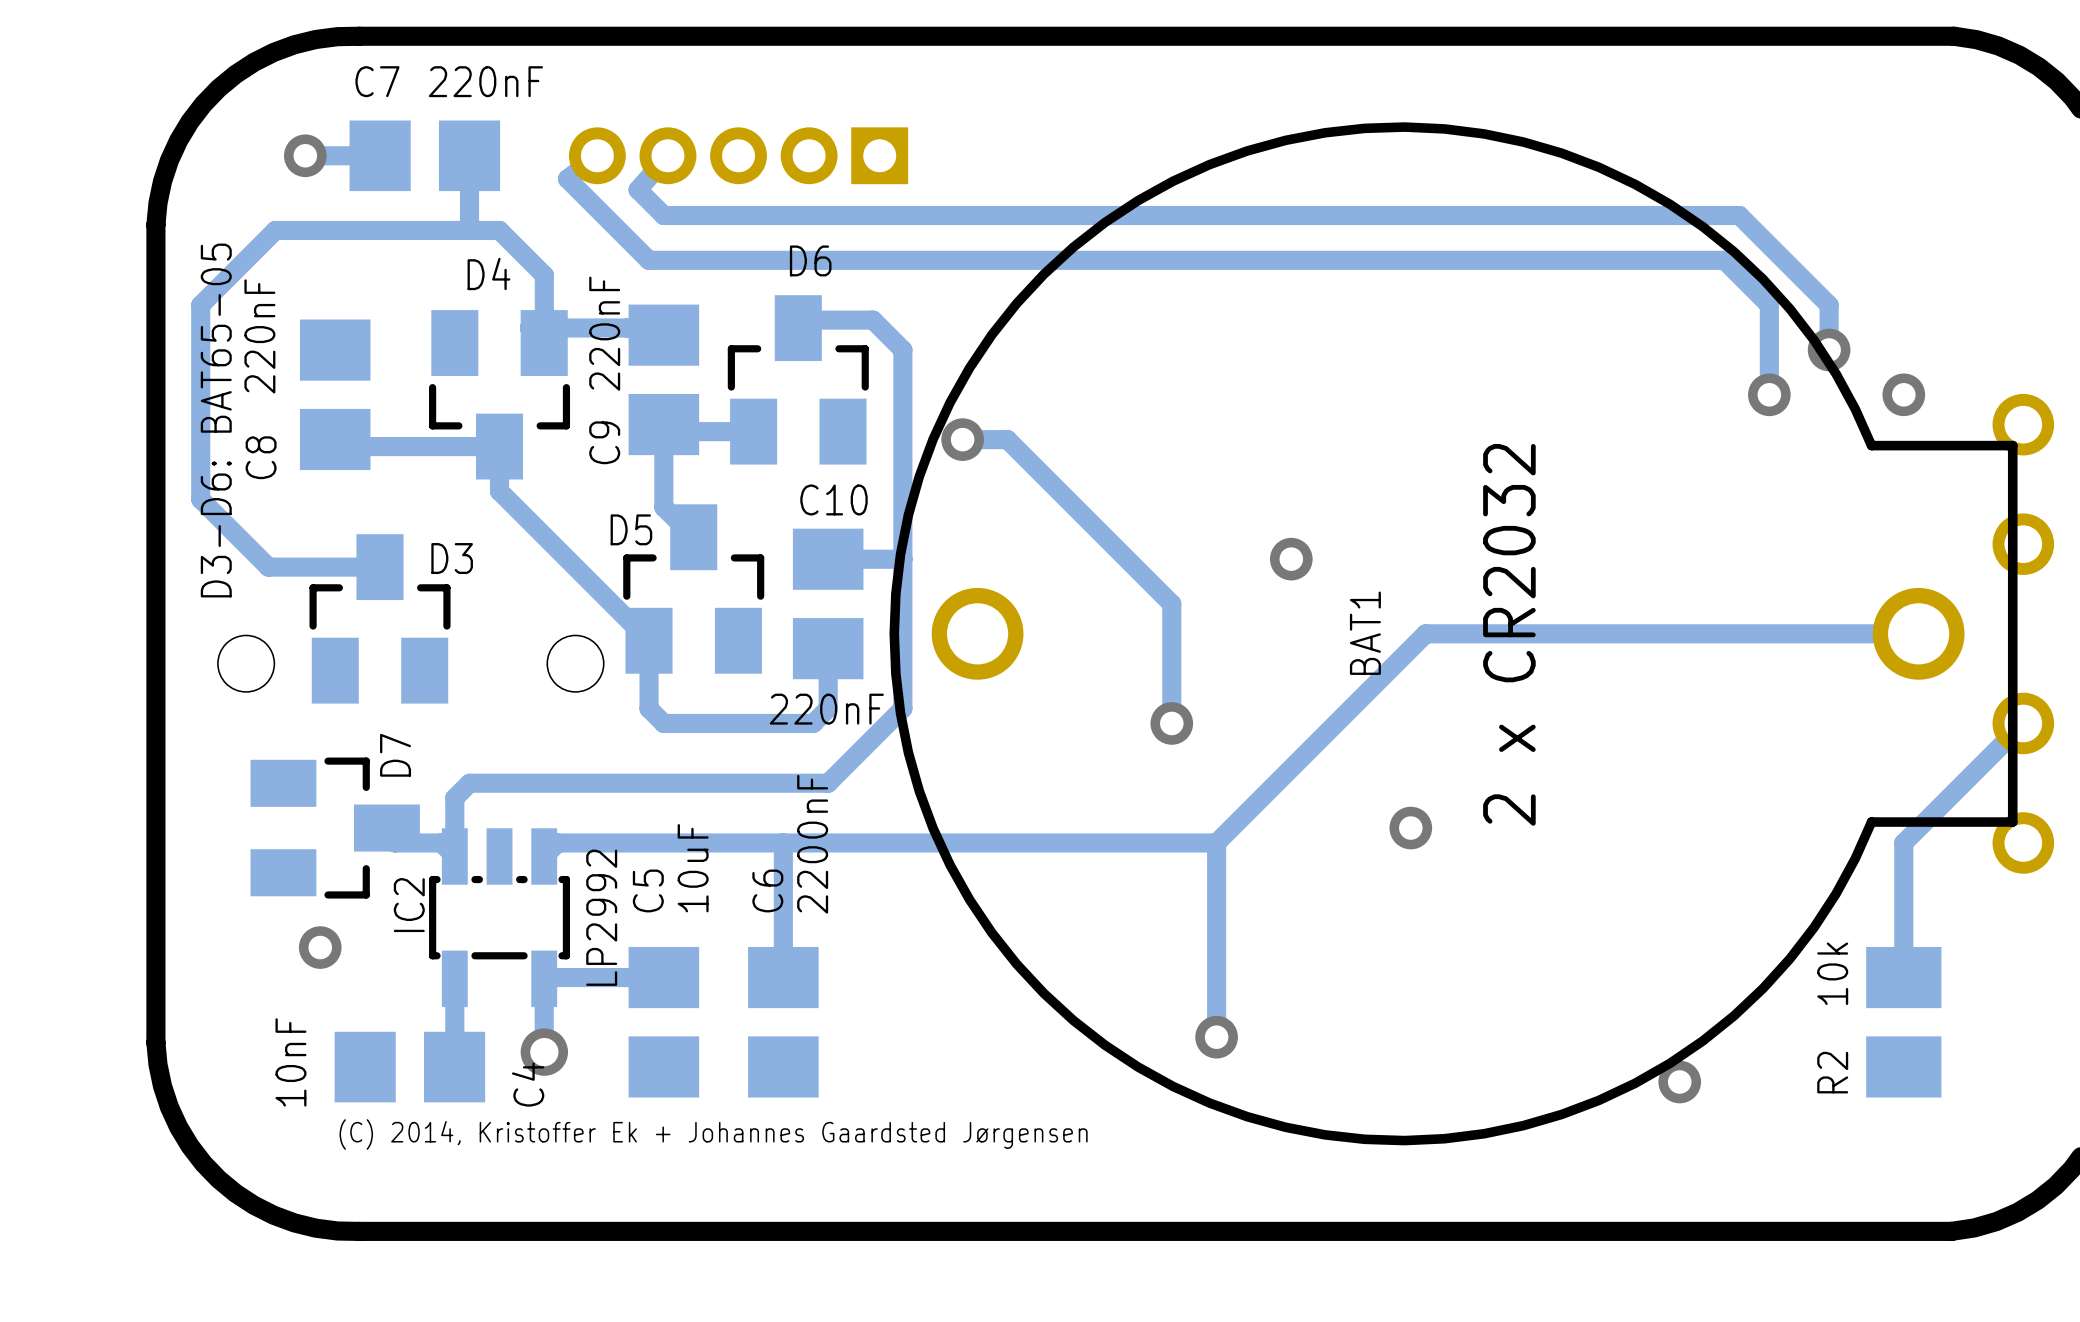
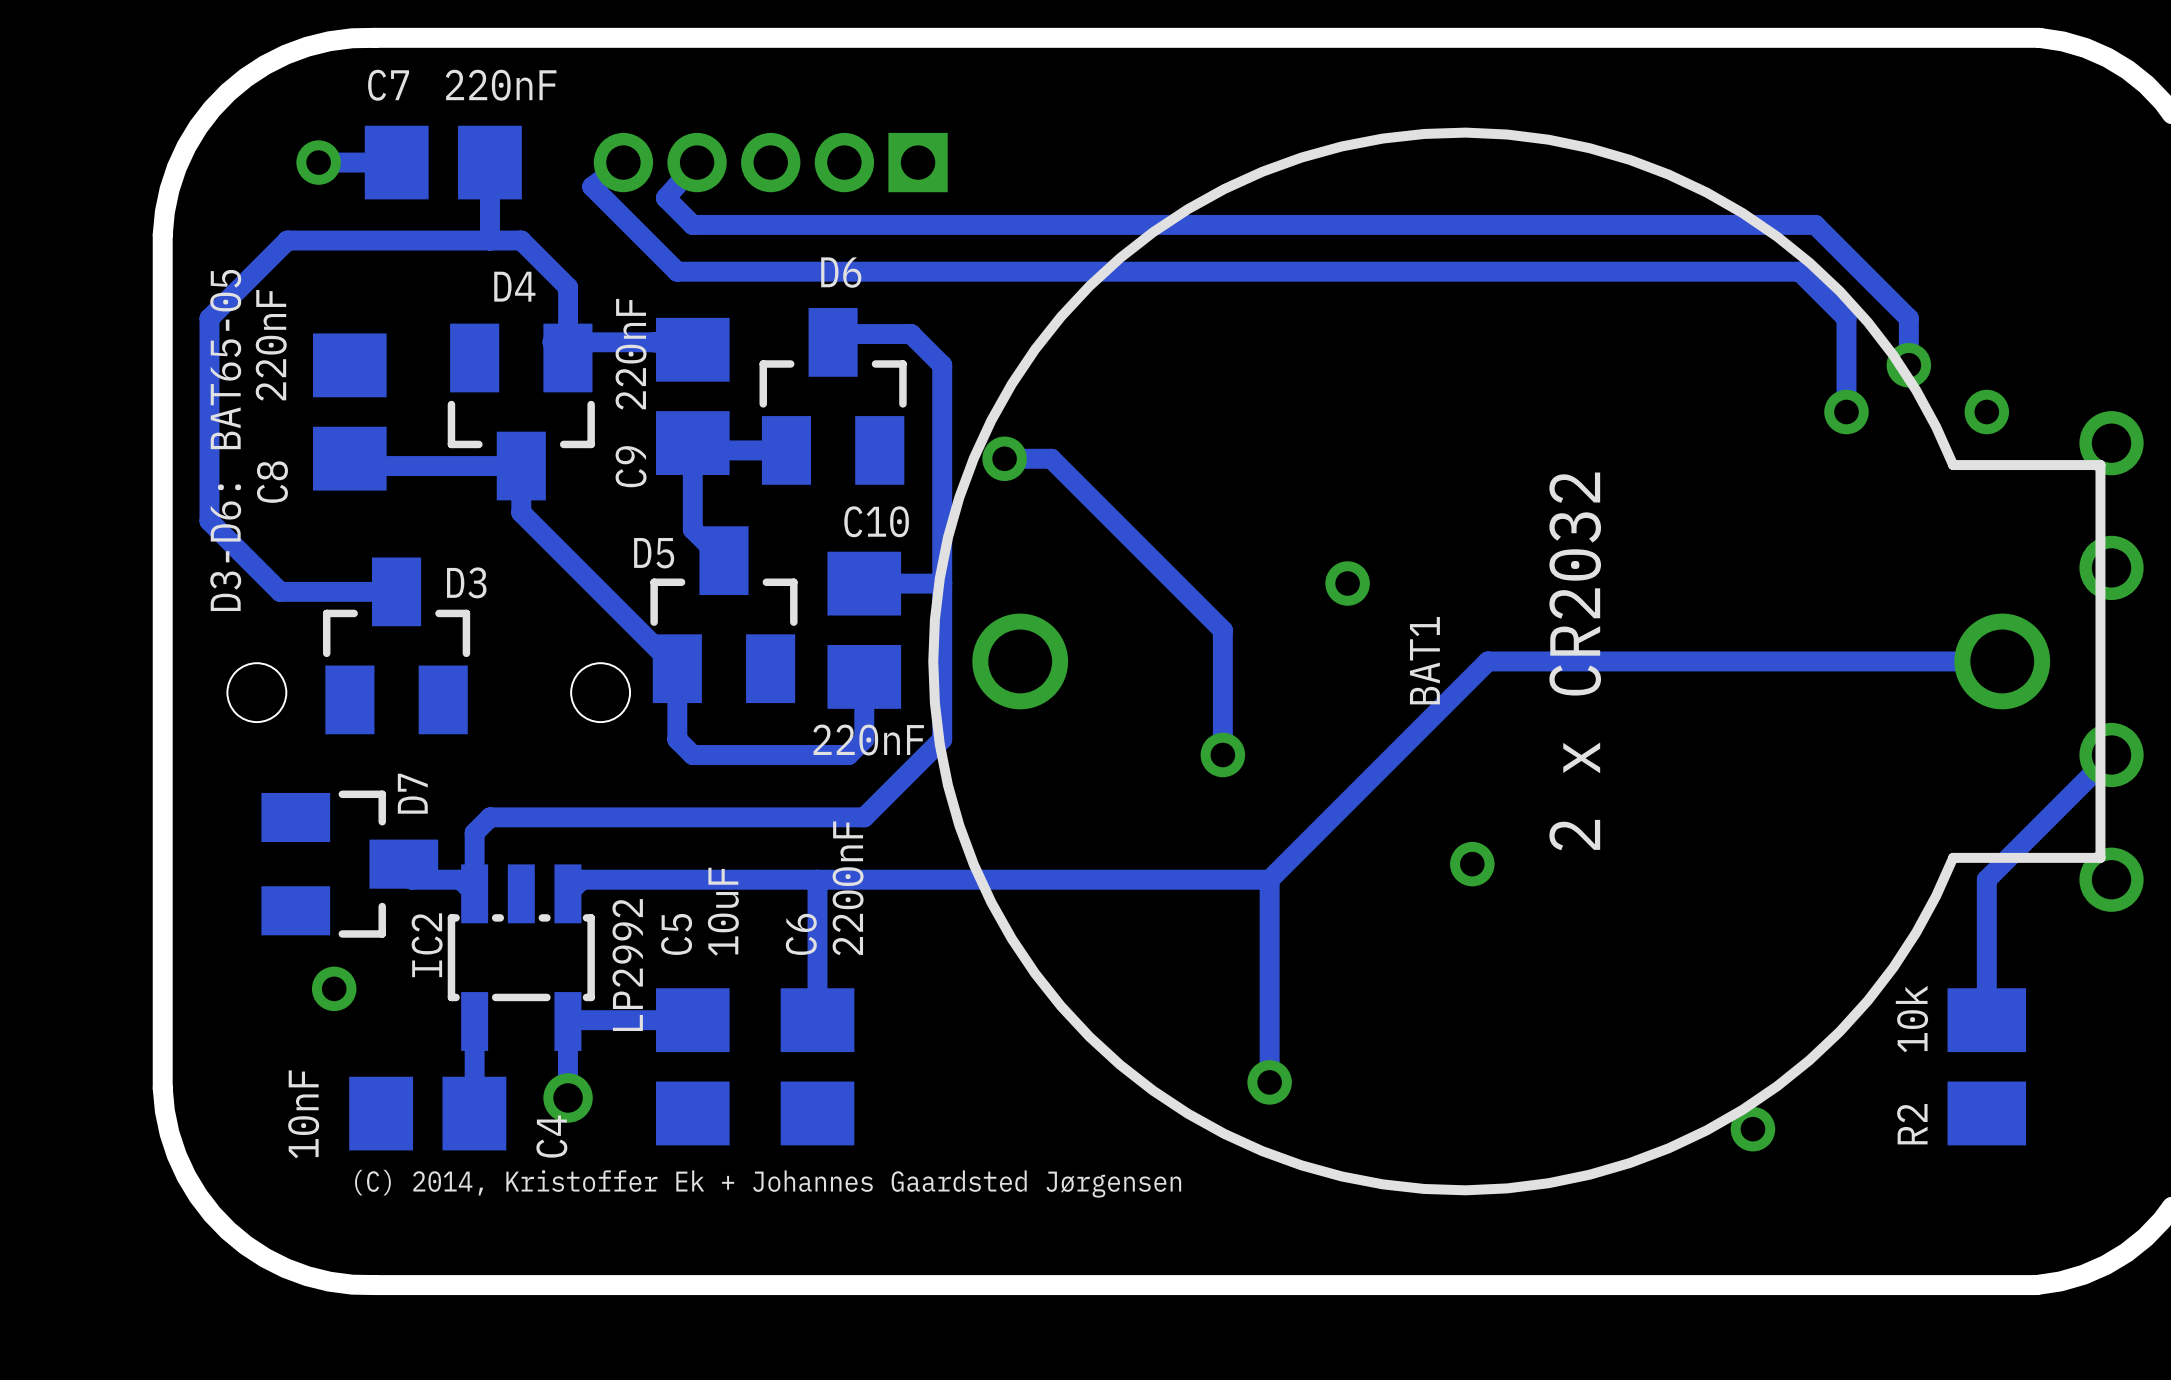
text position: D3-D6: BAT65-05 (216, 420) -> D3-D6: BAT65-05 (225, 440)

